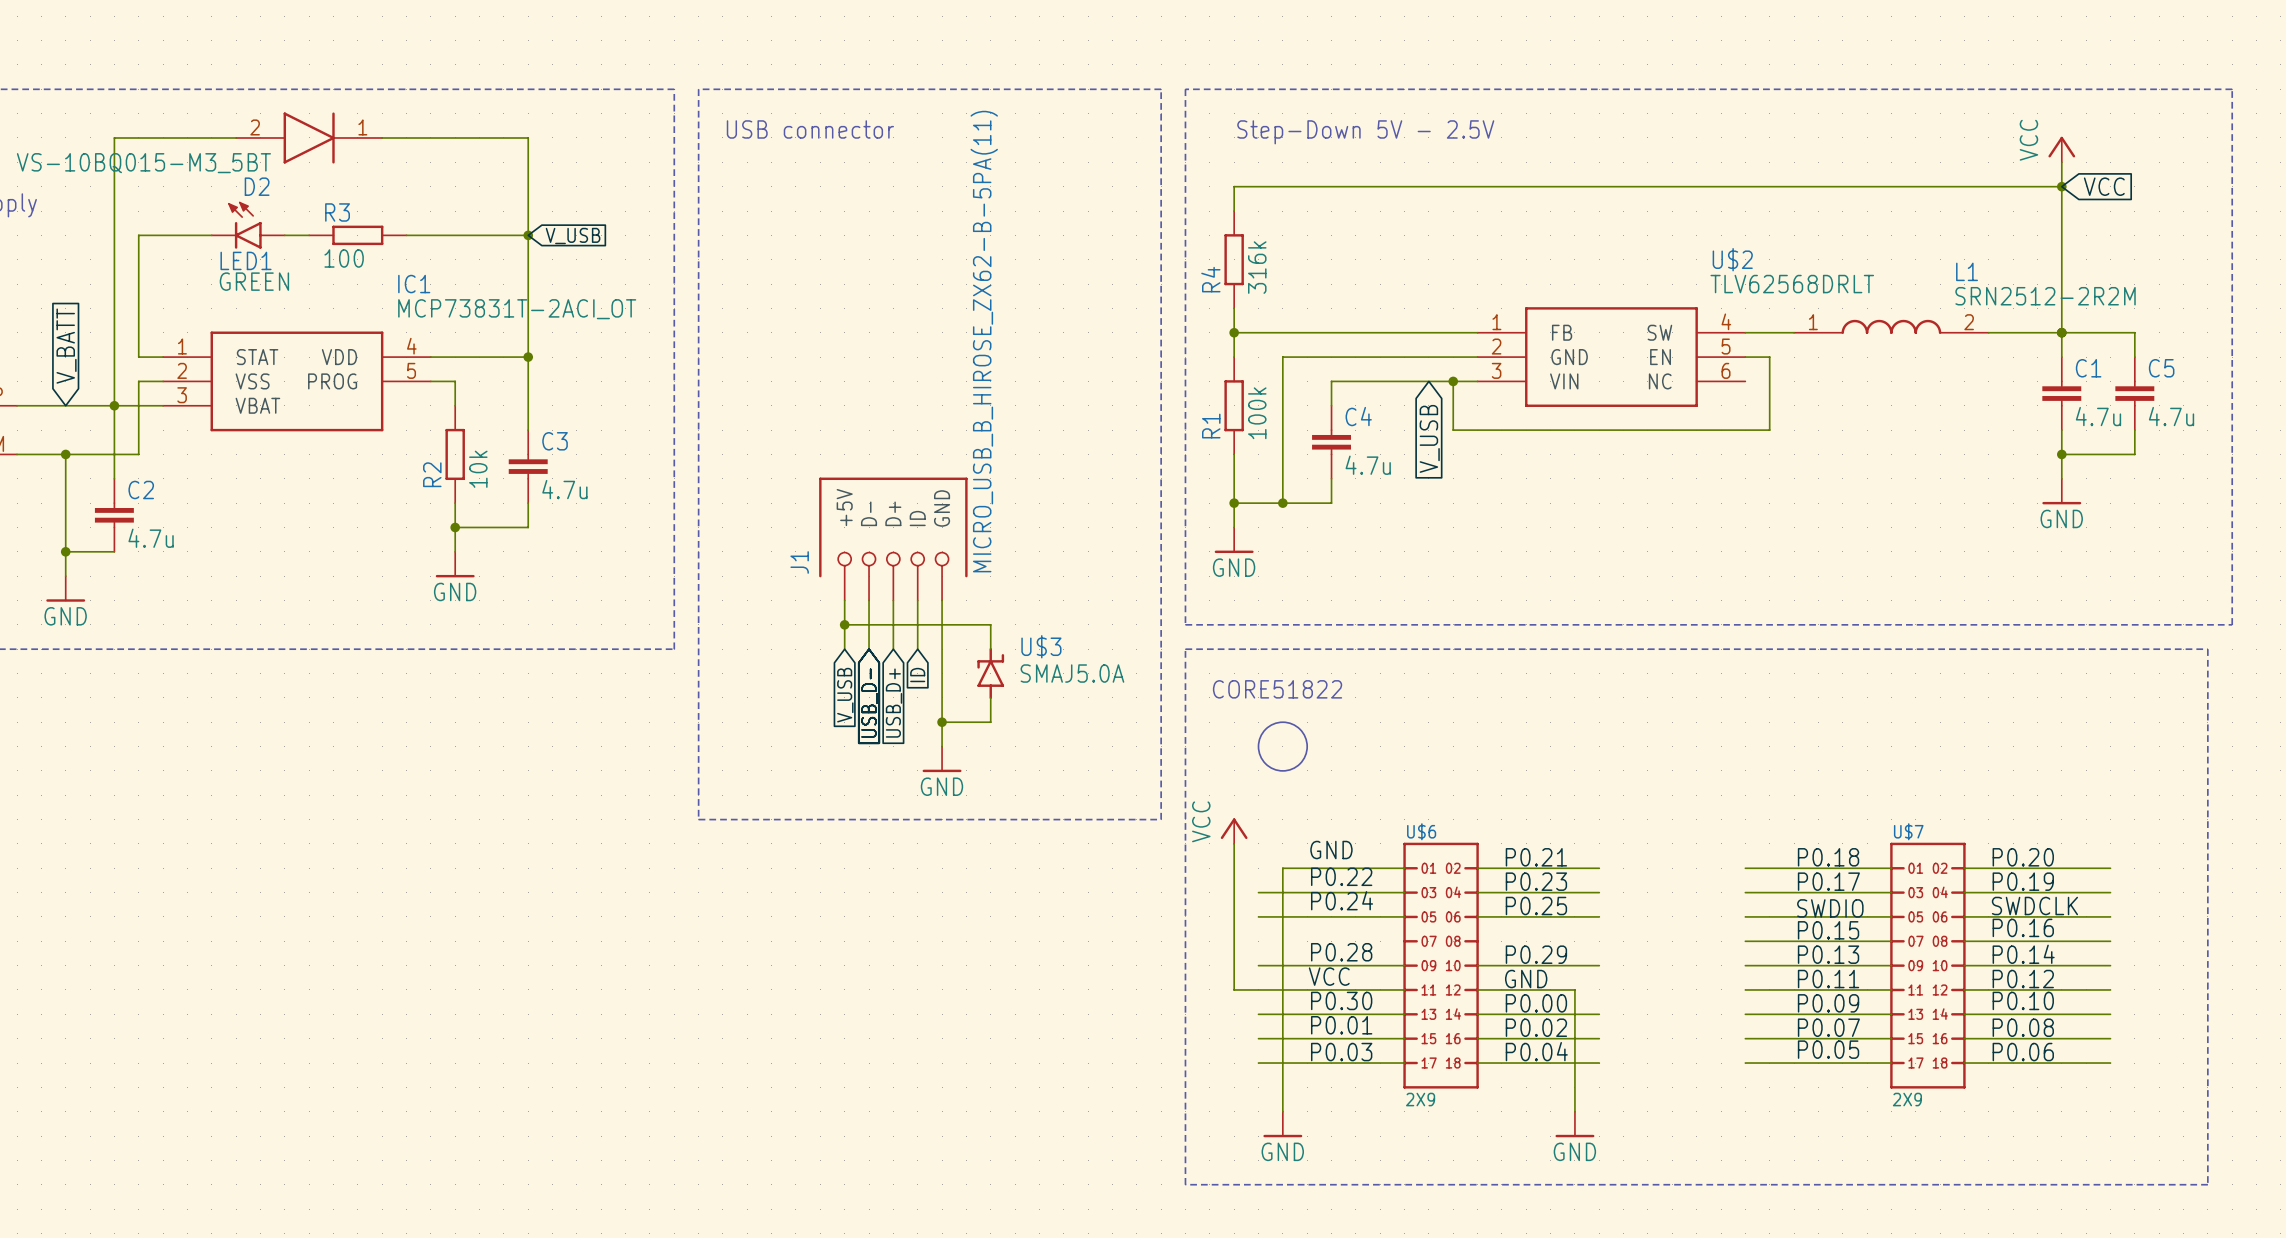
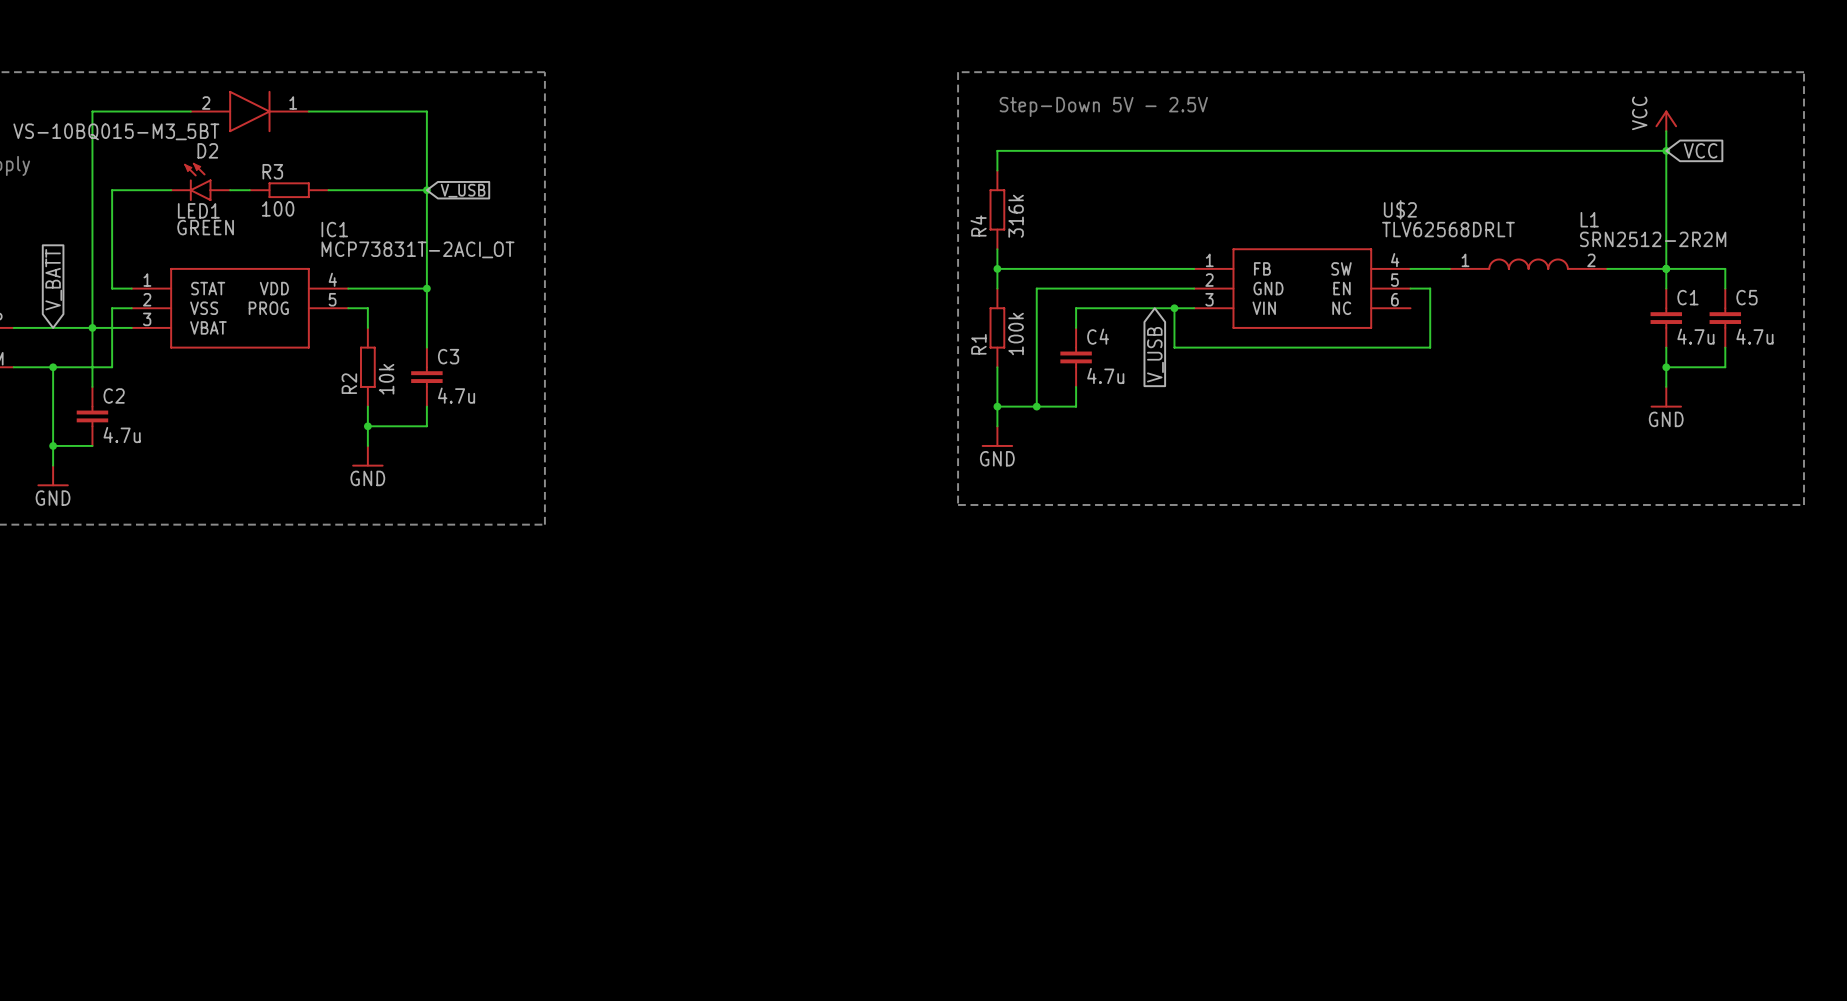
line: (698, 89) (1161, 89) (1161, 819) (698, 819) (698, 89) -> none
text: USB connector (810, 129) -> none
J1: MICRO_USB_B_HIROSE_ZX62-B-5PA(11) (893, 539) -> none
wire: (844, 600) (844, 649) -> none
wire: (869, 600) (869, 649) -> none
wire: (893, 600) (893, 649) -> none
wire: (917, 600) (917, 649) -> none
wire: (942, 600) (942, 746) -> none
wire: (844, 624) (990, 624) (990, 649) -> none
junction: (844, 624) -> none
line: (1185, 649) (1185, 1184) (2207, 1184) (2207, 649) (1185, 649) -> none
U$3: SMAJ5.0A (990, 673) -> none
global label: ID (917, 675) -> none
text: CORE51822 (1277, 689) -> none
global label: V_USB (845, 695) -> none
wire: (990, 697) (990, 722) (942, 722) -> none
global label: USB_D- (869, 703) -> none
global label: USB_D+ (894, 703) -> none
drawing: [1257, 721, 1308, 772] -> none
junction: (942, 722) -> none
power symbol: GND (942, 759) -> none
power symbol: VCC (1234, 831) -> none
wire: (1234, 843) (1234, 989) (1404, 989) -> none
label: GND (1331, 850) -> none
label: P0.21 (1536, 857) -> none
label: P0.18 (1828, 857) -> none
label: P0.20 (2023, 857) -> none
wire: (1404, 868) (1282, 868) (1282, 1111) -> none
wire: (1477, 868) (1599, 868) -> none
wire: (1745, 868) (1891, 868) -> none
wire: (1964, 868) (2110, 868) -> none
label: P0.22 (1341, 876) -> none
label: P0.23 (1536, 881) -> none
label: P0.17 (1828, 881) -> none
label: P0.19 (2023, 881) -> none
wire: (1258, 892) (1404, 892) -> none
wire: (1477, 892) (1599, 892) -> none
wire: (1745, 892) (1891, 892) -> none
wire: (1964, 892) (2110, 892) -> none
label: P0.24 (1342, 900) -> none
label: P0.25 (1536, 906) -> none
label: SWDCLK (2034, 906) -> none
label: SWDIO (1830, 908) -> none
wire: (1258, 916) (1404, 916) -> none
wire: (1477, 916) (1599, 916) -> none
wire: (1745, 916) (1891, 916) -> none
wire: (1964, 916) (2110, 916) -> none
label: P0.16 (2023, 927) -> none
label: P0.15 (1828, 930) -> none
wire: (1745, 941) (1891, 941) -> none
wire: (1964, 941) (2110, 941) -> none
label: P0.28 (1341, 952) -> none
label: P0.29 (1536, 954) -> none
label: P0.13 (1828, 954) -> none
label: P0.14 (2023, 954) -> none
wire: (1258, 965) (1404, 965) -> none
U$6: 2X9 (1441, 965) -> none
wire: (1477, 965) (1599, 965) -> none
wire: (1745, 965) (1891, 965) -> none
U$7: 2X9 (1927, 965) -> none
wire: (1964, 965) (2110, 965) -> none
label: VCC (1329, 976) -> none
label: GND (1526, 979) -> none
label: P0.11 (1828, 979) -> none
label: P0.12 (2023, 979) -> none
wire: (1477, 989) (1574, 989) (1574, 1111) -> none
wire: (1745, 989) (1891, 989) -> none
wire: (1964, 989) (2110, 989) -> none
label: P0.30 (1341, 1000) -> none
label: P0.10 (2023, 1000) -> none
label: P0.00 (1536, 1003) -> none
label: P0.09 (1828, 1003) -> none
wire: (1258, 1014) (1404, 1014) -> none
wire: (1477, 1014) (1599, 1014) -> none
wire: (1745, 1014) (1891, 1014) -> none
wire: (1964, 1014) (2110, 1014) -> none
label: P0.01 (1341, 1025) -> none
label: P0.02 (1536, 1027) -> none
label: P0.07 (1828, 1027) -> none
label: P0.08 (2023, 1027) -> none
wire: (1258, 1038) (1404, 1038) -> none
wire: (1477, 1038) (1599, 1038) -> none
wire: (1745, 1038) (1891, 1038) -> none
wire: (1964, 1038) (2110, 1038) -> none
label: P0.05 (1828, 1049) -> none
label: P0.04 (1536, 1051) -> none
label: P0.03 (1341, 1052) -> none
label: P0.06 (2023, 1052) -> none
wire: (1258, 1063) (1404, 1063) -> none
wire: (1477, 1063) (1599, 1063) -> none
wire: (1745, 1063) (1891, 1063) -> none
wire: (1964, 1063) (2110, 1063) -> none
power symbol: GND (1282, 1124) -> none
power symbol: GND (1574, 1124) -> none

